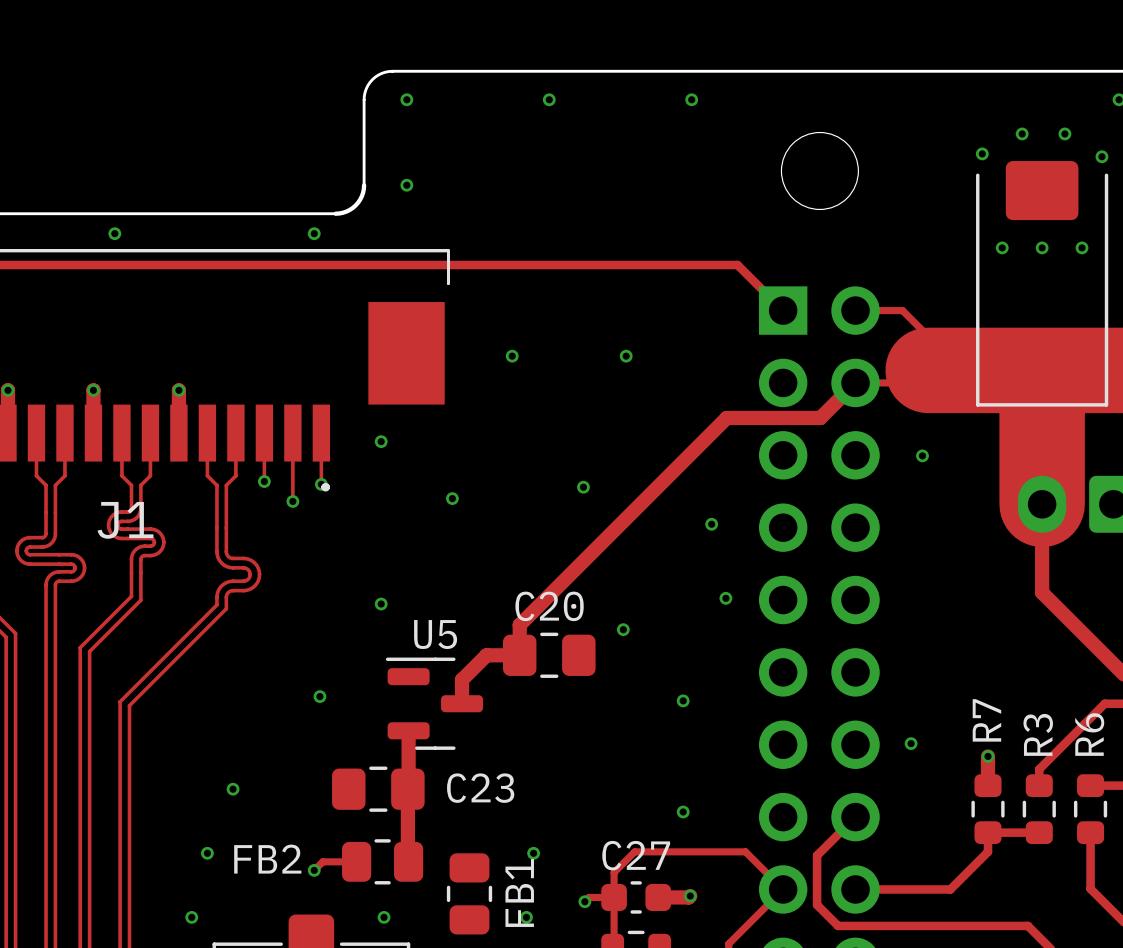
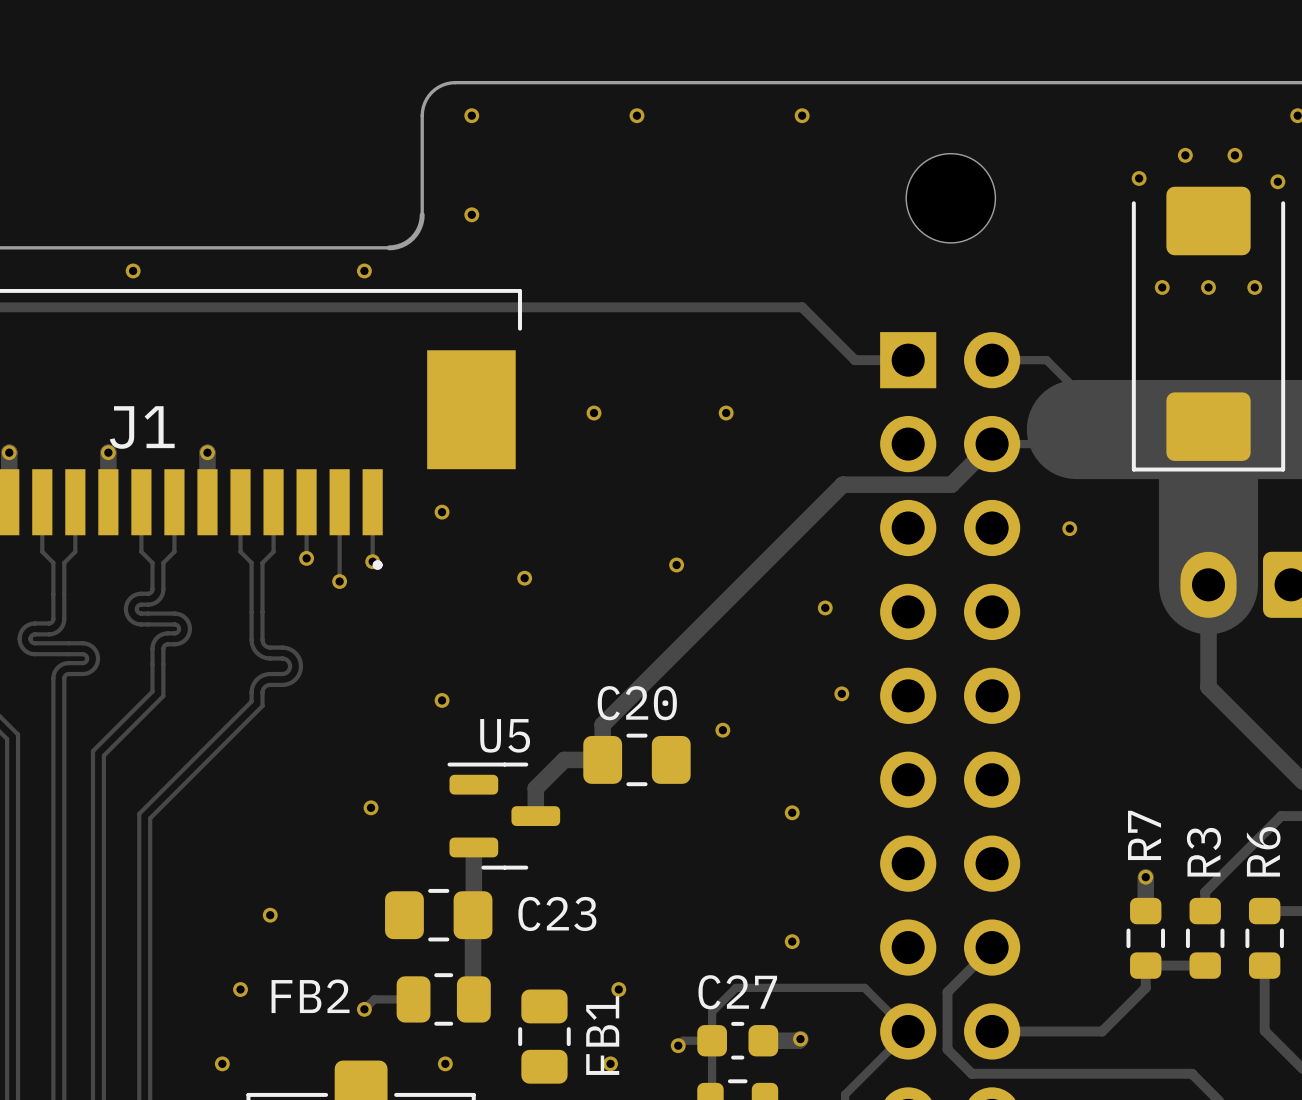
track: (691, 265) (737, 265) (783, 310) -> (802, 307) (855, 360) (908, 360)
J1 name position: J1 (125, 520) -> J1 (142, 427)
via: (911, 743) -> none

